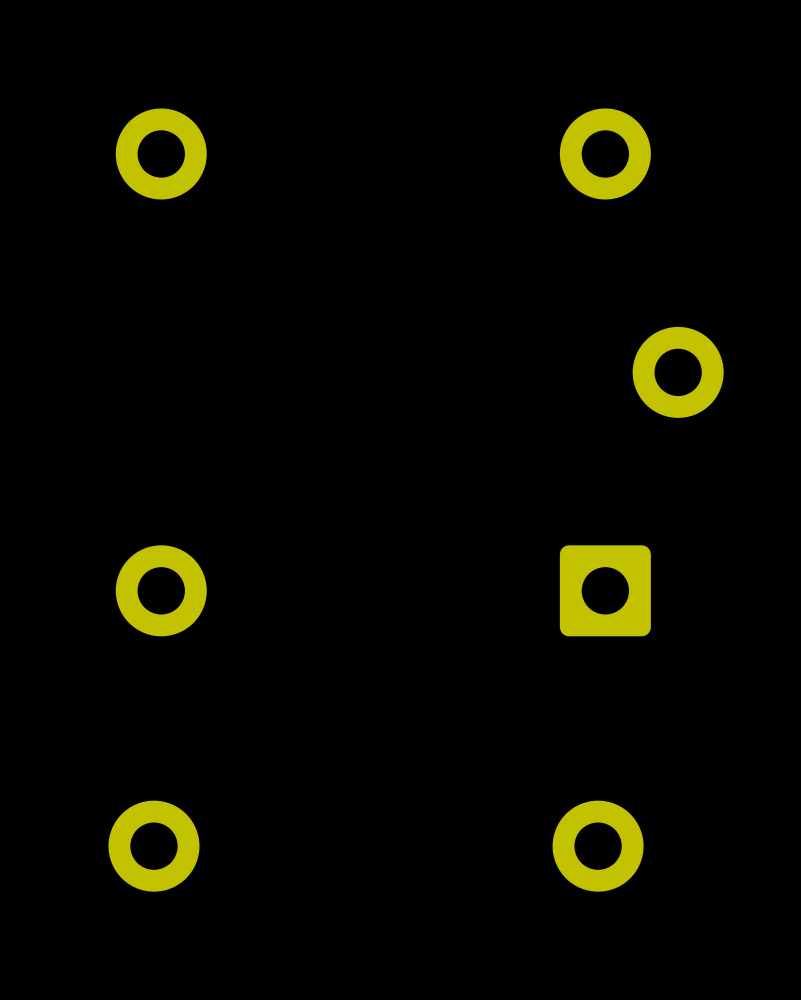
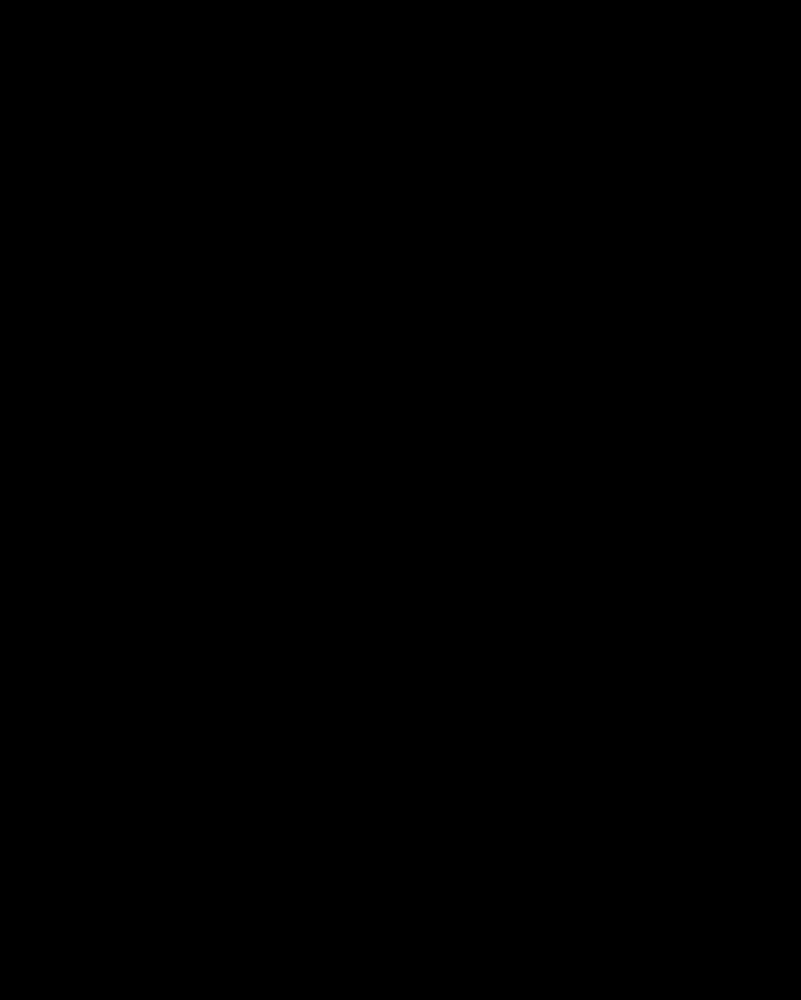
part: (161, 153) -> none
part: (605, 153) -> none
part: (678, 372) -> none
part: (161, 590) -> none
part: (605, 590) -> none
part: (153, 846) -> none
part: (598, 846) -> none

